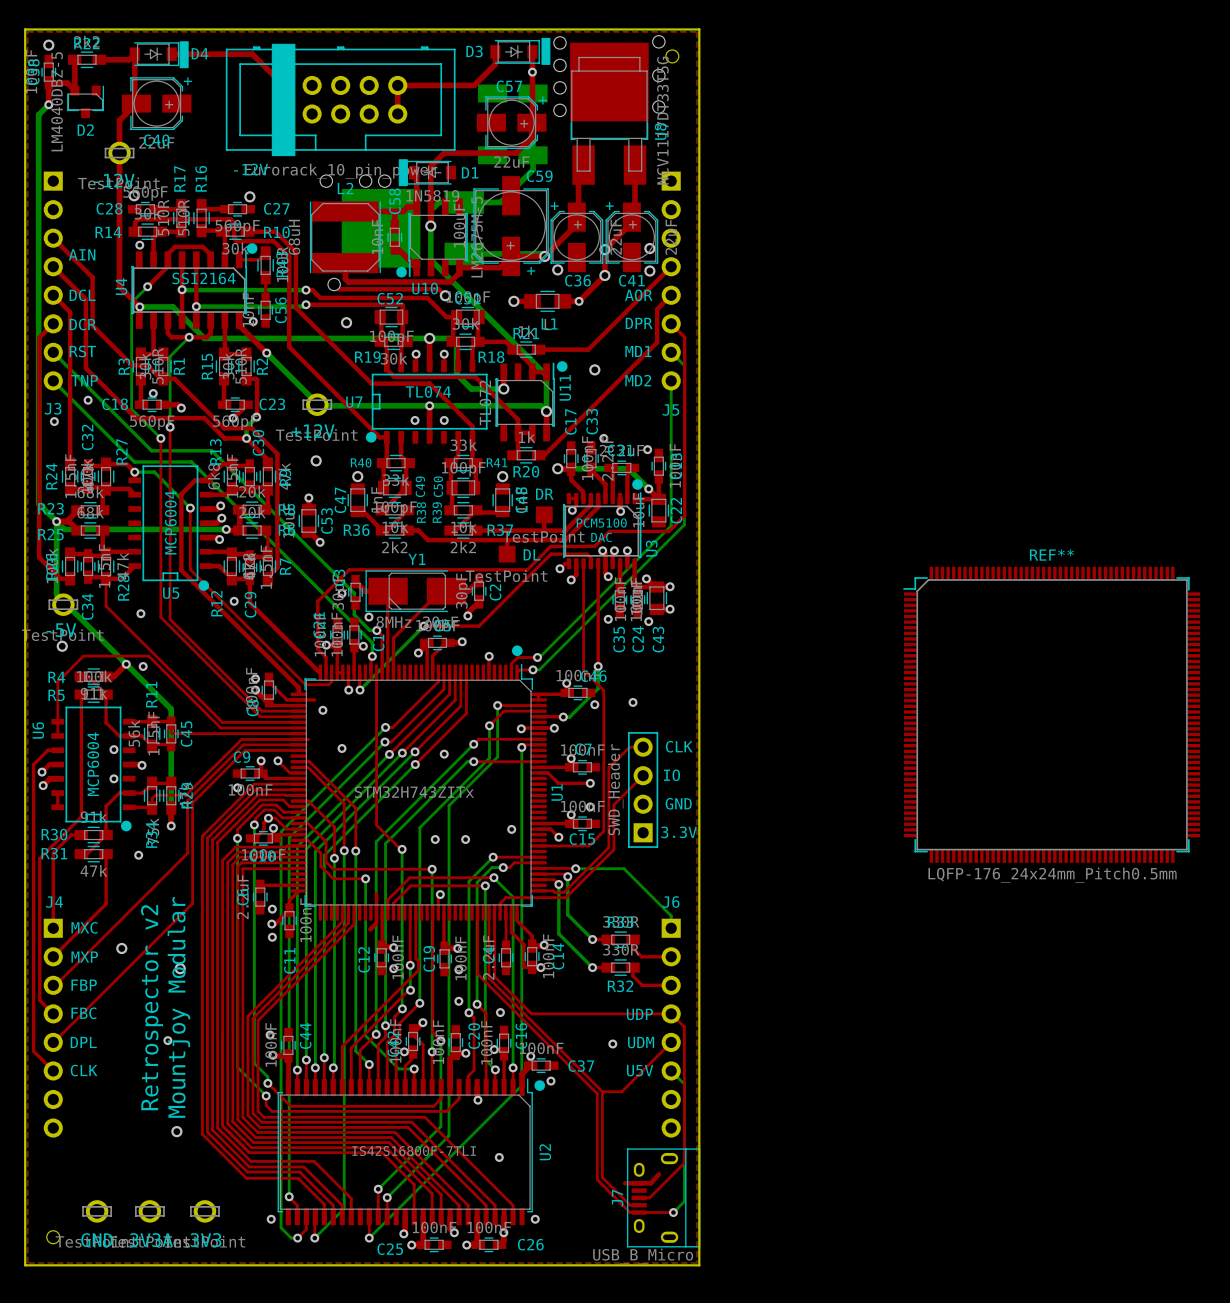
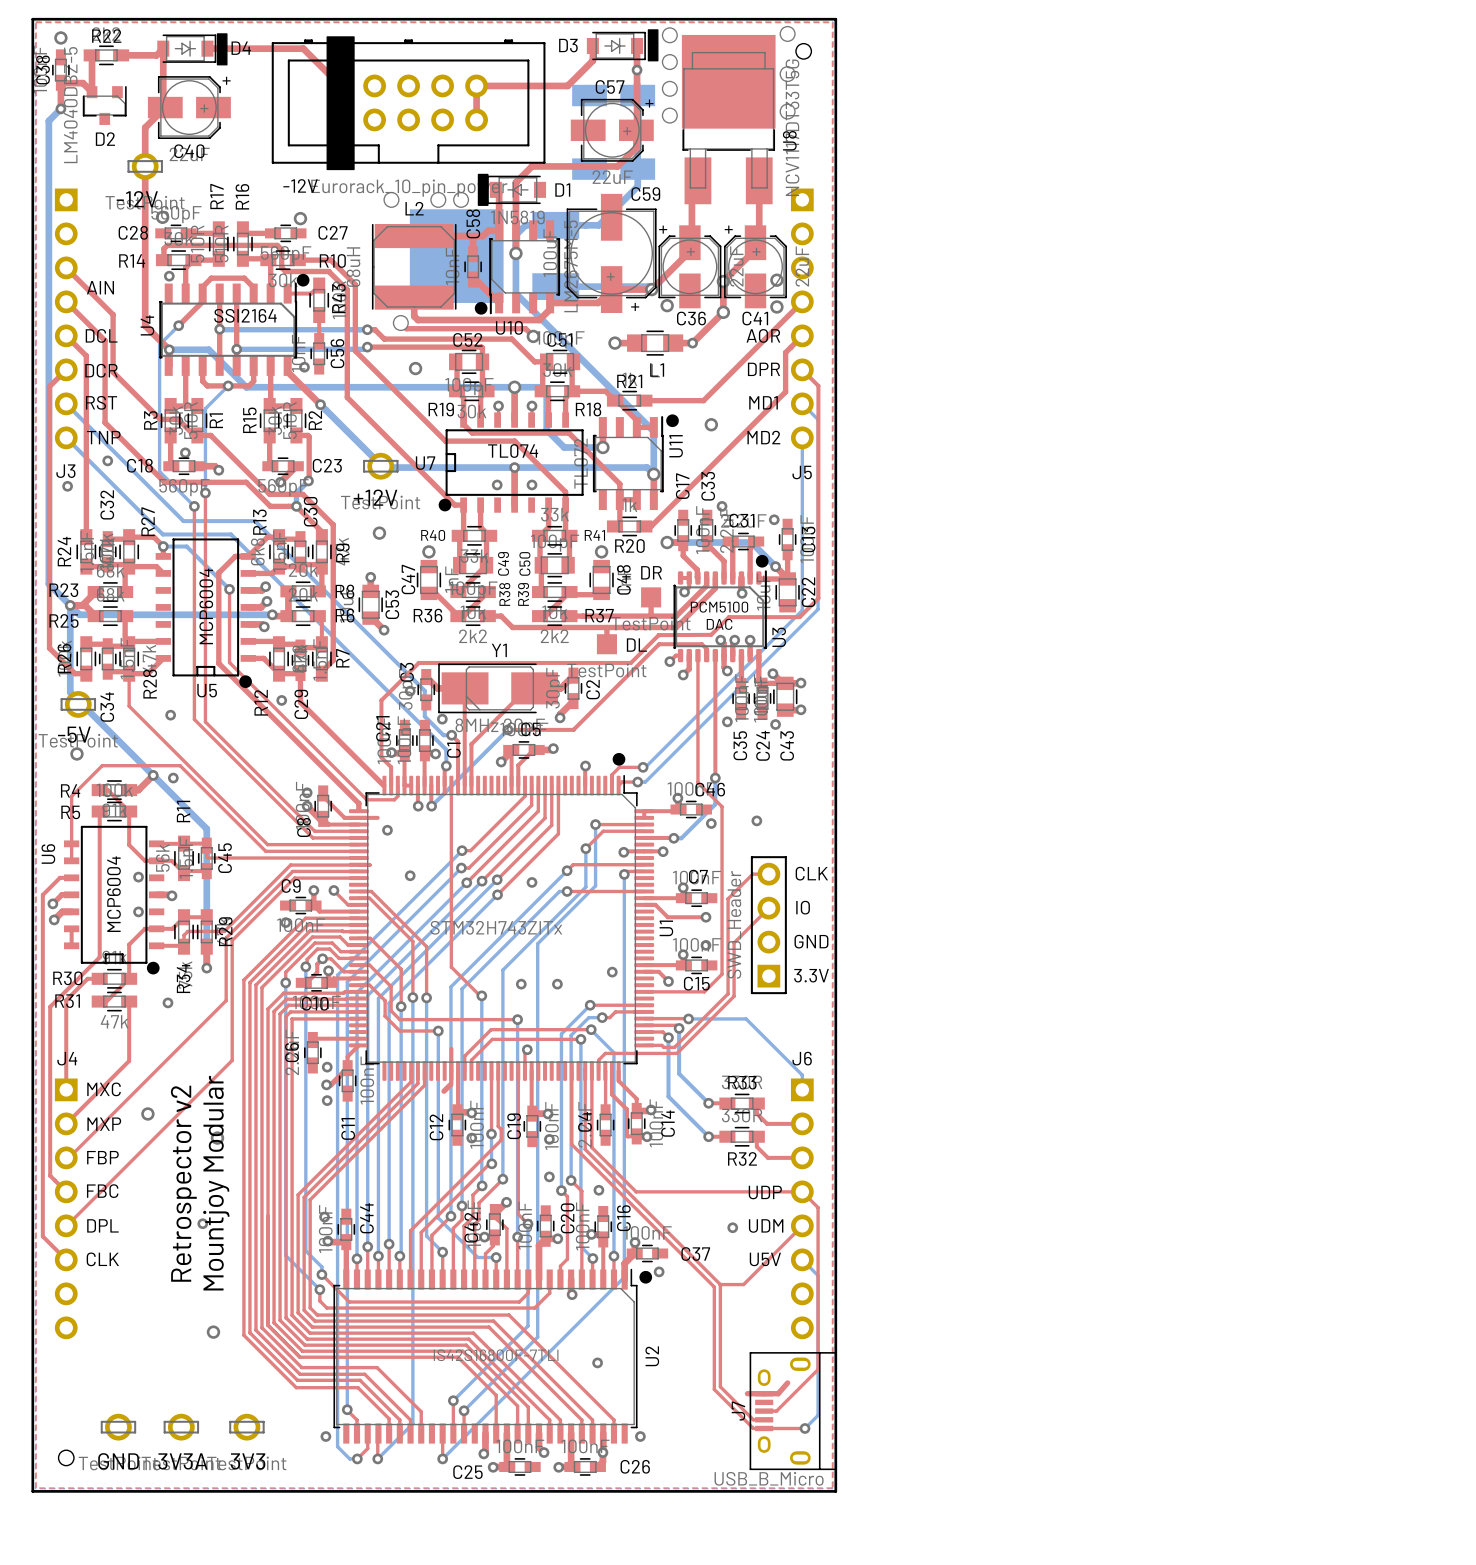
REF**: LQFP-176_24x24mm_Pitch0.5mm (1051, 714) -> none

